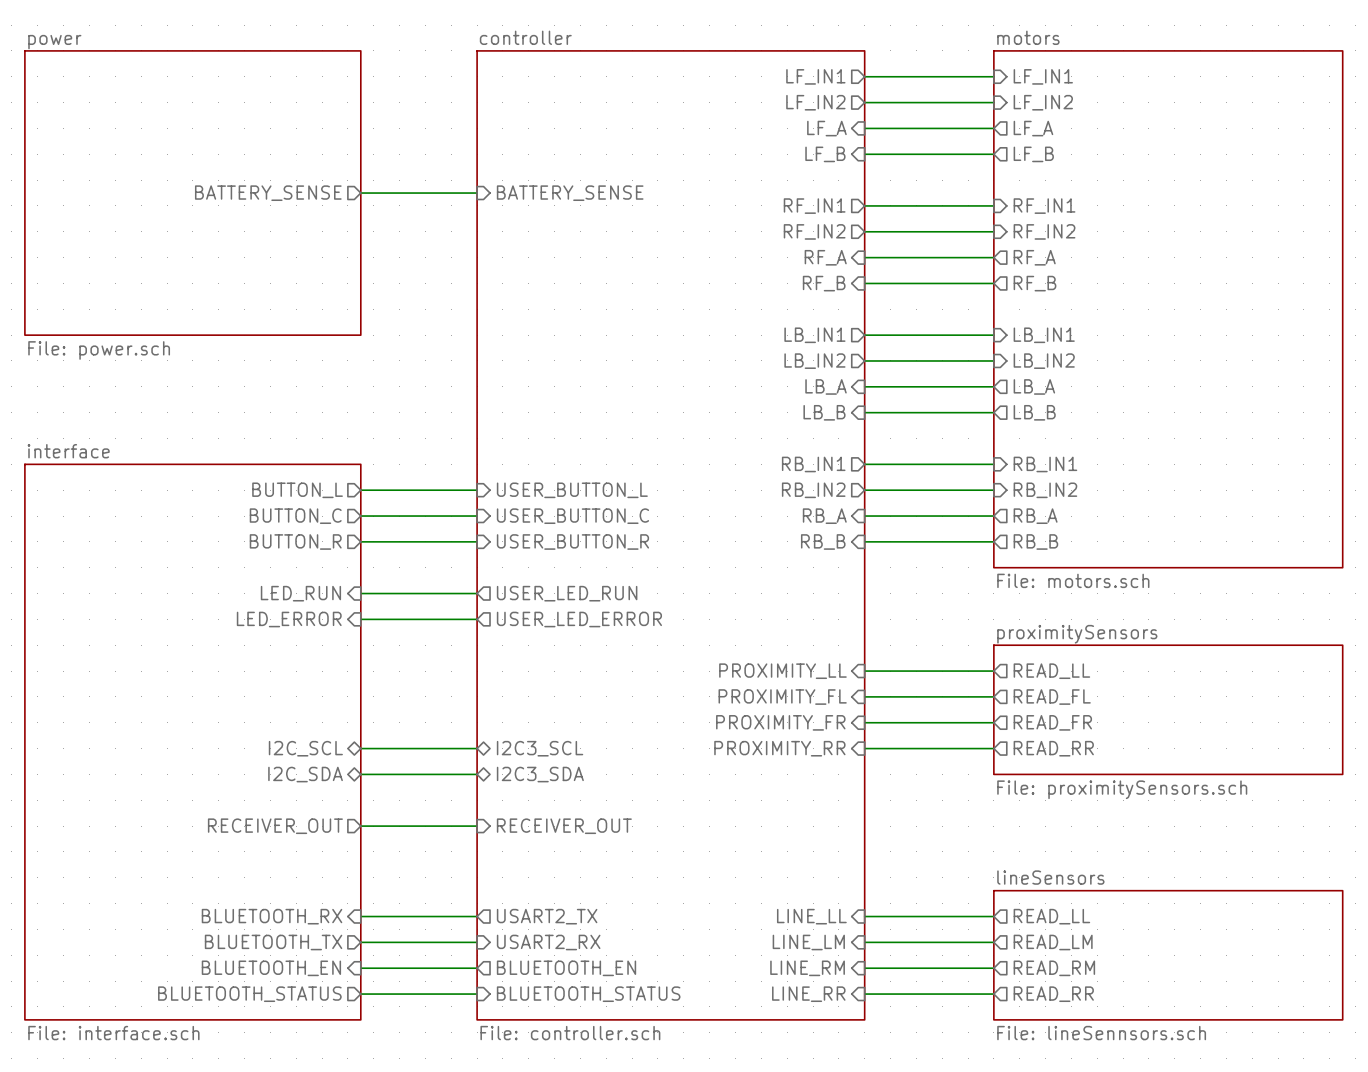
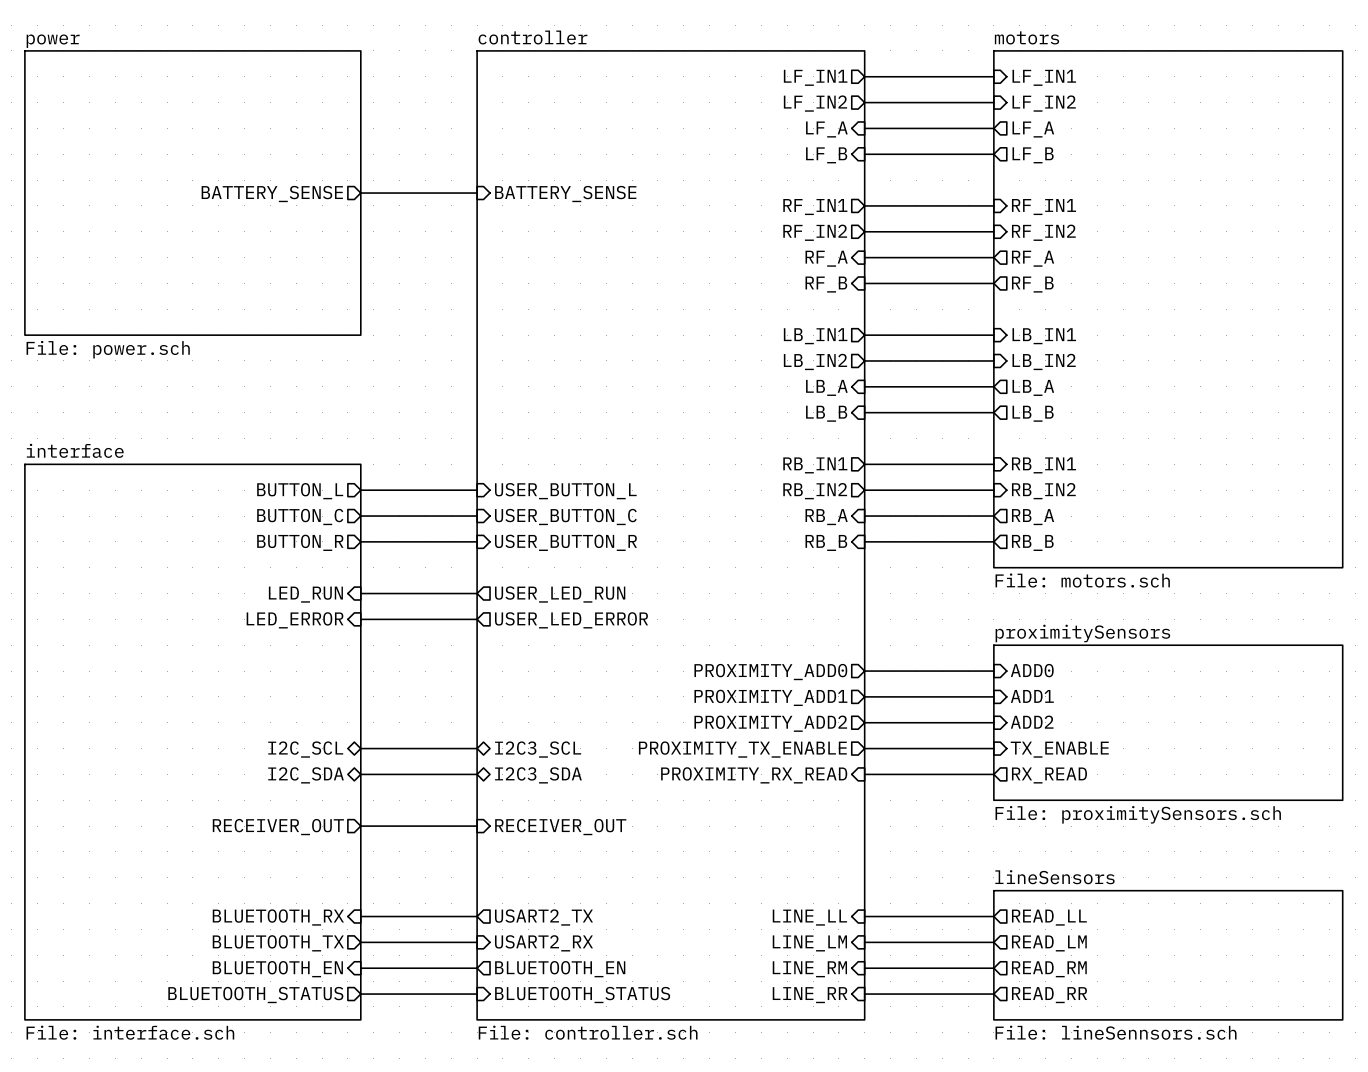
sheet pin shape: input (782, 671) -> output (770, 672)
sheet pin: PROXIMITY_LL (782, 671) -> PROXIMITY_ADD0 (770, 672)
sheet pin shape: output (1051, 671) -> input (1032, 670)
sheet pin: READ_LL (1051, 671) -> ADD0 (1032, 670)
sheet pin shape: input (782, 697) -> output (770, 697)
sheet pin: PROXIMITY_FL (782, 697) -> PROXIMITY_ADD1 (770, 697)
sheet pin shape: output (1052, 697) -> input (1032, 696)
sheet pin: READ_FL (1052, 697) -> ADD1 (1032, 696)
sheet proximitySensors: File: proximitySensors.sch (1168, 709) -> none
sheet pin shape: input (780, 722) -> output (770, 723)
sheet pin: PROXIMITY_FR (780, 722) -> PROXIMITY_ADD2 (770, 723)
sheet pin shape: output (1052, 722) -> input (1032, 722)
sheet pin: READ_FR (1052, 722) -> ADD2 (1032, 722)
sheet proximitySensors: none -> File: proximitySensors.sch (1168, 722)
sheet pin shape: input (779, 748) -> output (742, 749)
sheet pin: PROXIMITY_RR (779, 748) -> PROXIMITY_TX_ENABLE (742, 749)
sheet pin shape: output (1053, 748) -> input (1059, 749)
sheet pin: READ_RR (1053, 748) -> TX_ENABLE (1059, 749)
sheet pin: none -> PROXIMITY_RX_READ (754, 775)
wire: none -> (864, 774) (993, 774)
sheet pin: none -> RX_READ (1049, 775)

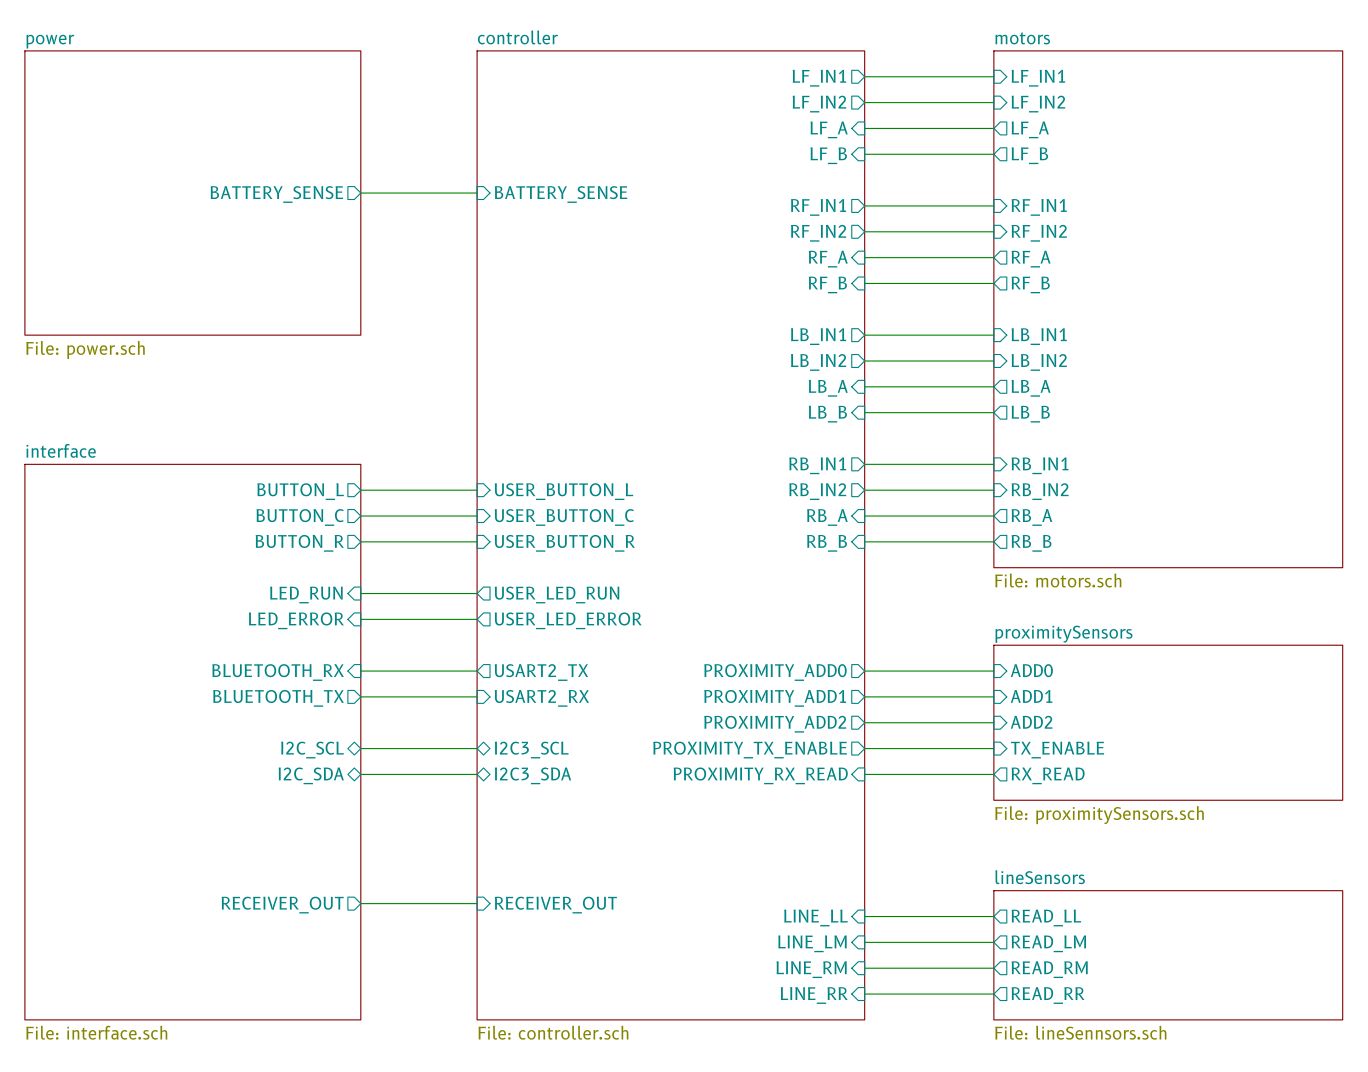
wire: (360, 826) (477, 826) -> none
sheet pin position: RECEIVER_OUT (278, 827) -> RECEIVER_OUT (282, 905)
sheet pin position: RECEIVER_OUT (560, 827) -> RECEIVER_OUT (555, 905)
wire: (360, 916) (477, 916) -> (360, 671) (477, 671)
sheet pin position: BLUETOOTH_RX (278, 917) -> BLUETOOTH_RX (278, 672)
sheet pin position: USART2_TX (543, 917) -> USART2_TX (541, 672)
wire: (360, 942) (477, 942) -> (360, 696) (477, 696)
sheet pin position: BLUETOOTH_TX (278, 943) -> BLUETOOTH_TX (278, 698)
sheet pin position: USART2_RX (543, 943) -> USART2_RX (541, 698)
wire: (360, 968) (477, 968) -> (360, 903) (477, 903)
sheet pin: BLUETOOTH_EN (277, 969) -> none
sheet pin: BLUETOOTH_EN (560, 969) -> none
wire: (360, 994) (477, 994) -> none
sheet pin: BLUETOOTH_STATUS (255, 995) -> none
sheet pin: BLUETOOTH_STATUS (582, 995) -> none

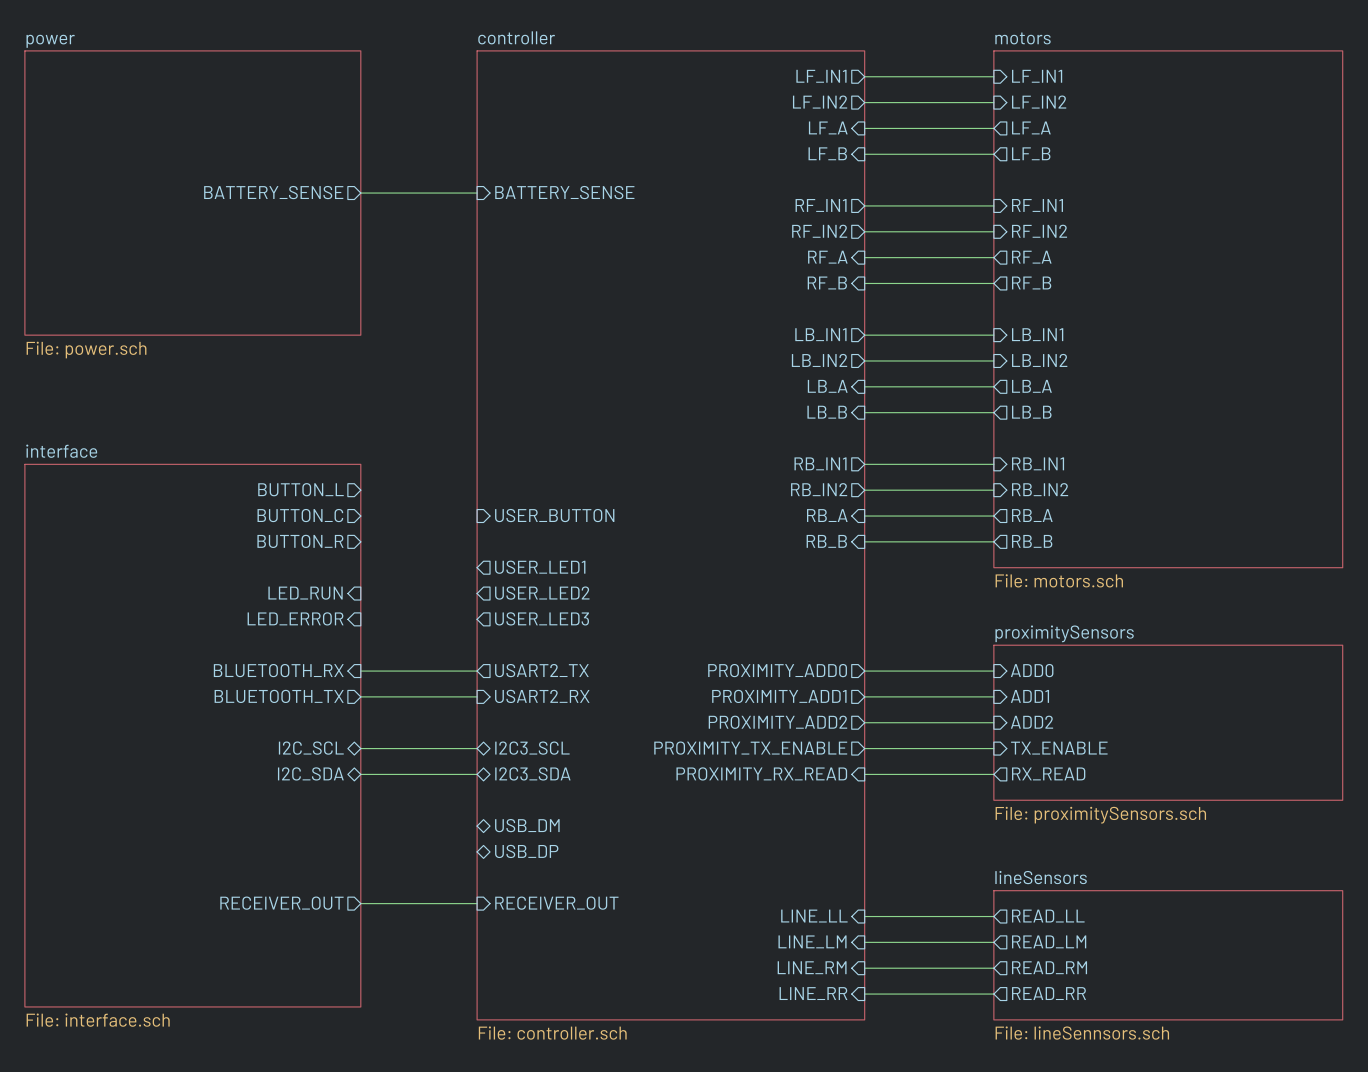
sheet interface shape: [24, 464, 361, 1020] -> [24, 464, 361, 1007]
wire: (360, 490) (477, 490) -> none
sheet pin: USER_BUTTON_L (564, 491) -> none
wire: (360, 516) (477, 516) -> none
sheet pin: USER_BUTTON_C (564, 517) -> USER_BUTTON (554, 515)
wire: (360, 541) (477, 541) -> none
sheet pin: USER_BUTTON_R (564, 543) -> none
sheet pin: none -> USER_LED1 (540, 567)
wire: (360, 593) (477, 593) -> none
sheet pin: USER_LED_RUN (557, 594) -> USER_LED2 (542, 593)
wire: (360, 619) (477, 619) -> none
sheet pin: USER_LED_ERROR (568, 620) -> USER_LED3 (542, 618)
sheet pin: none -> USB_DM (527, 825)
sheet pin: none -> USB_DP (526, 851)

